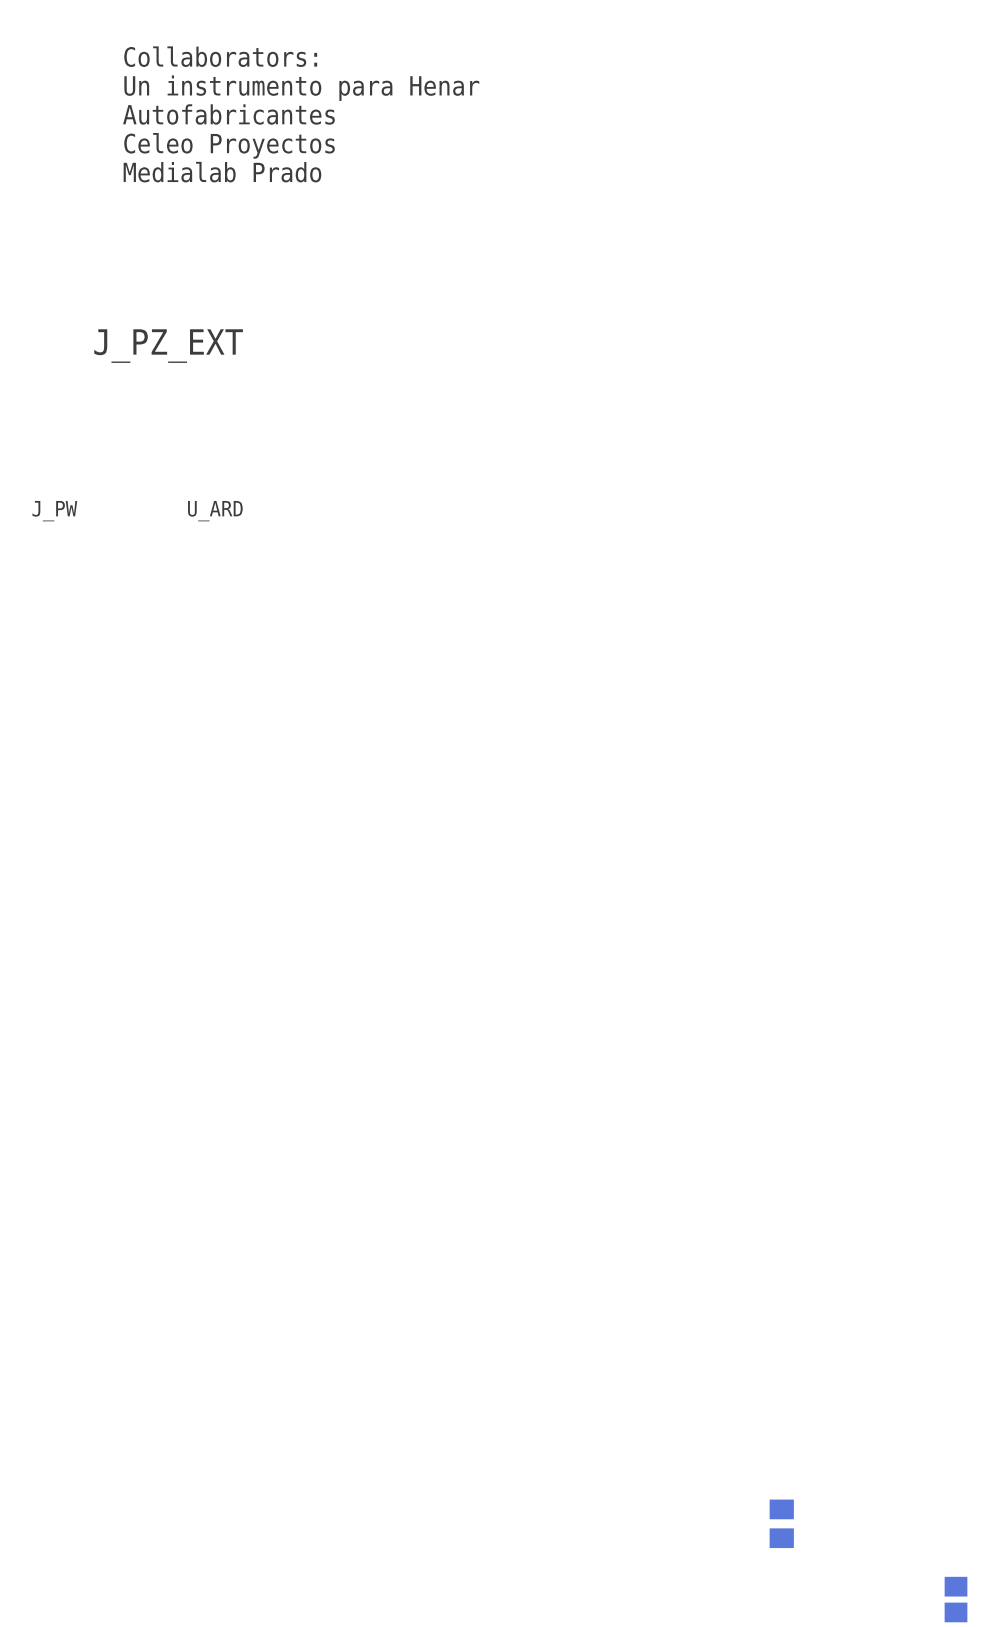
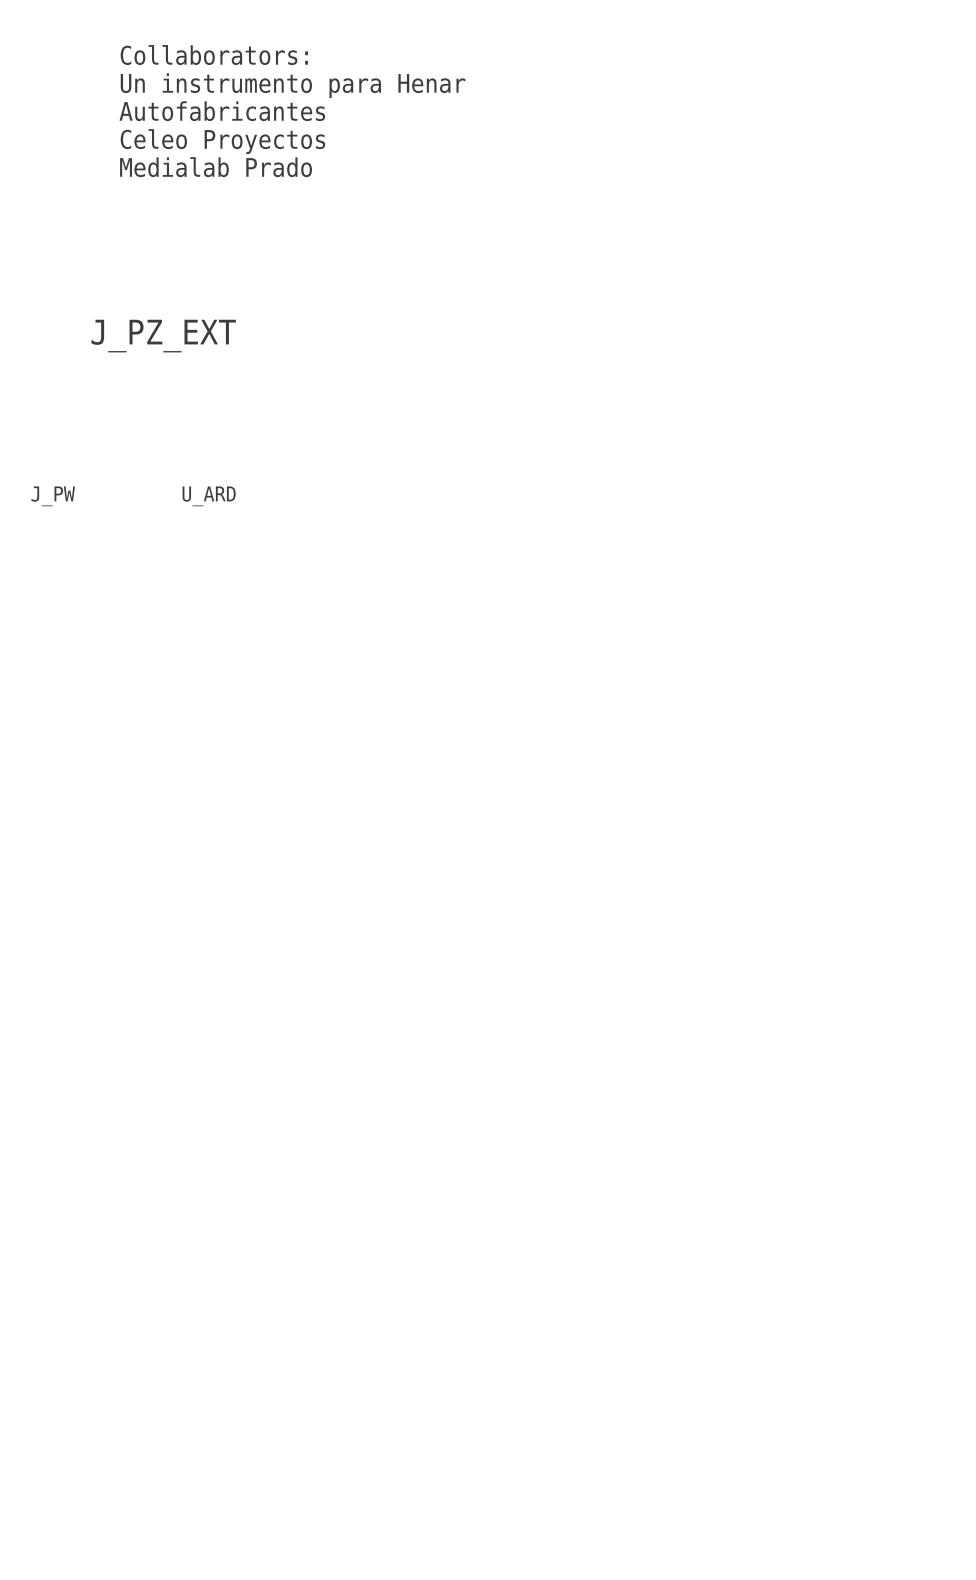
part: (781, 1523) -> none
part: (956, 1599) -> none

